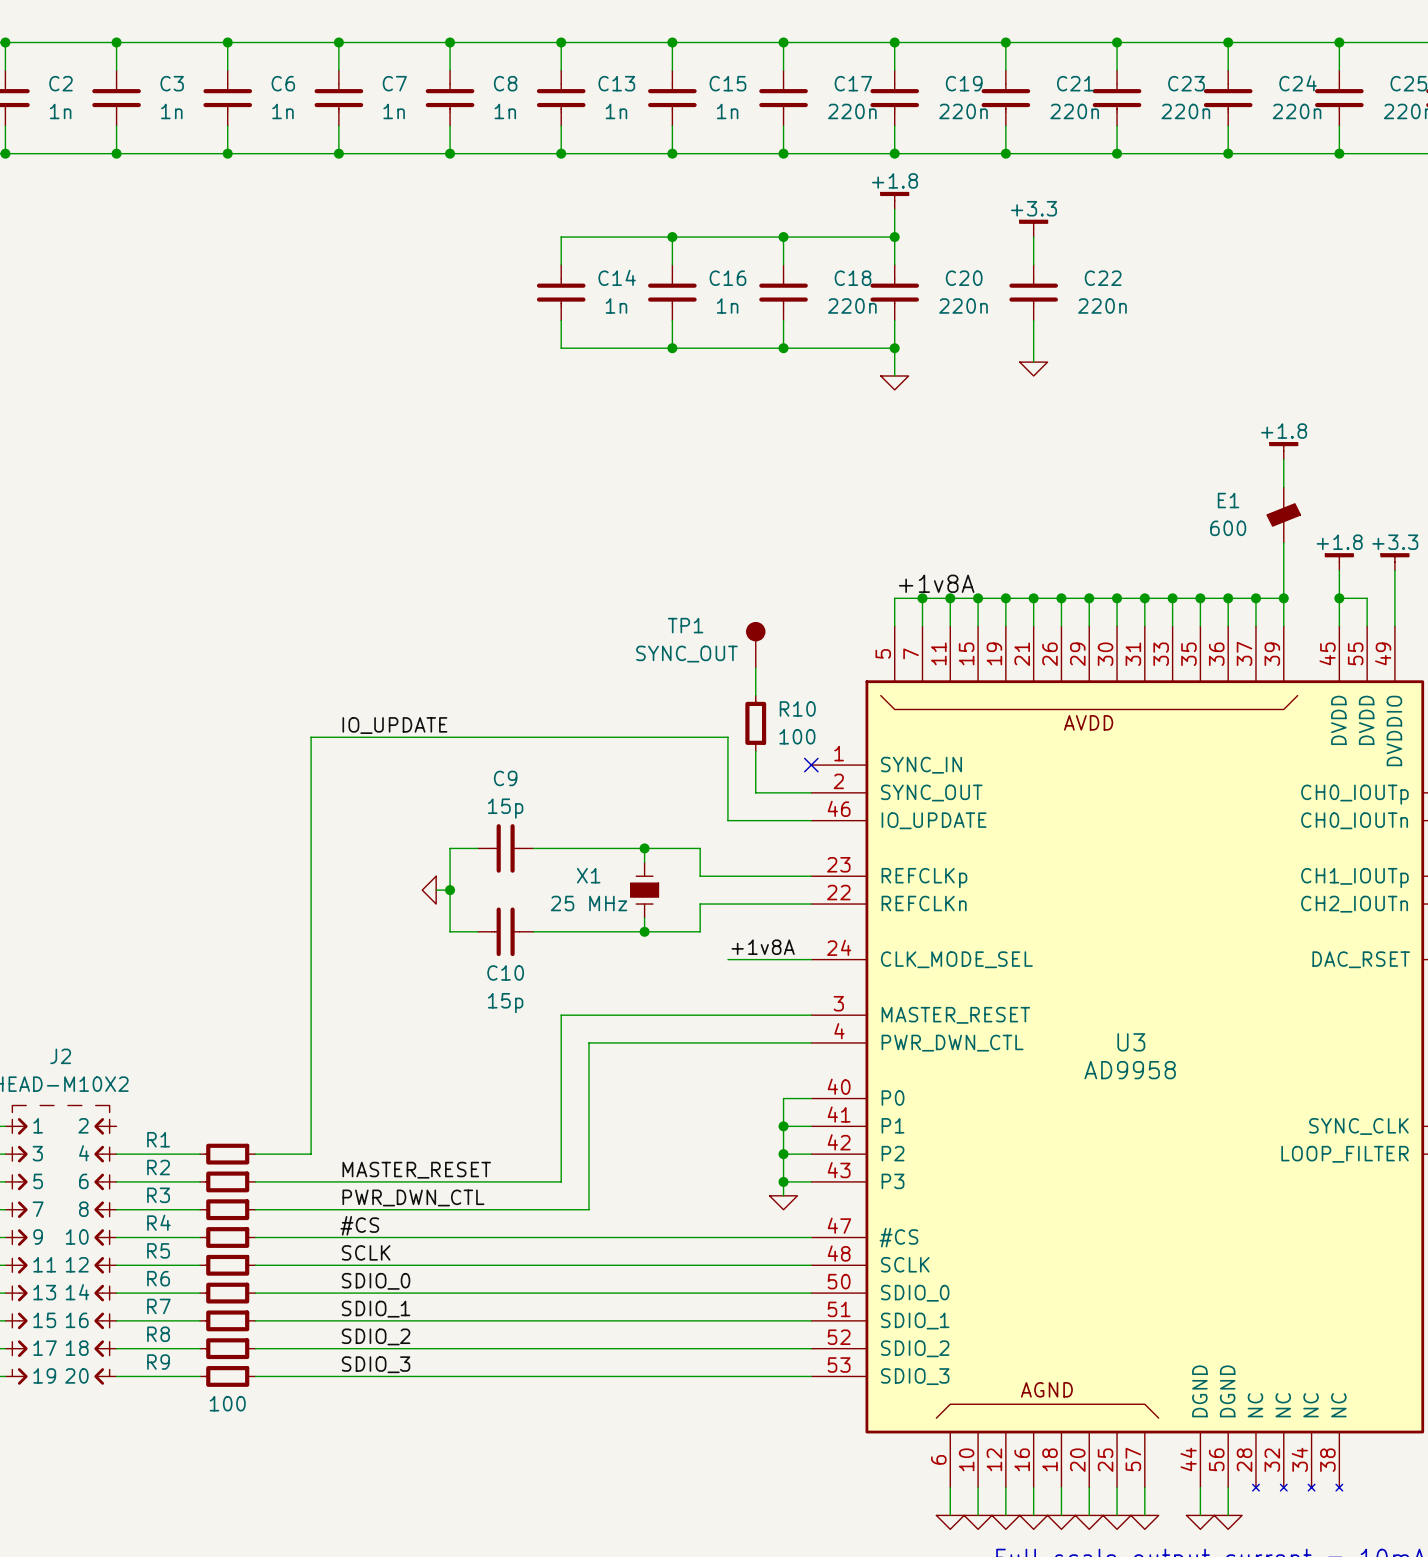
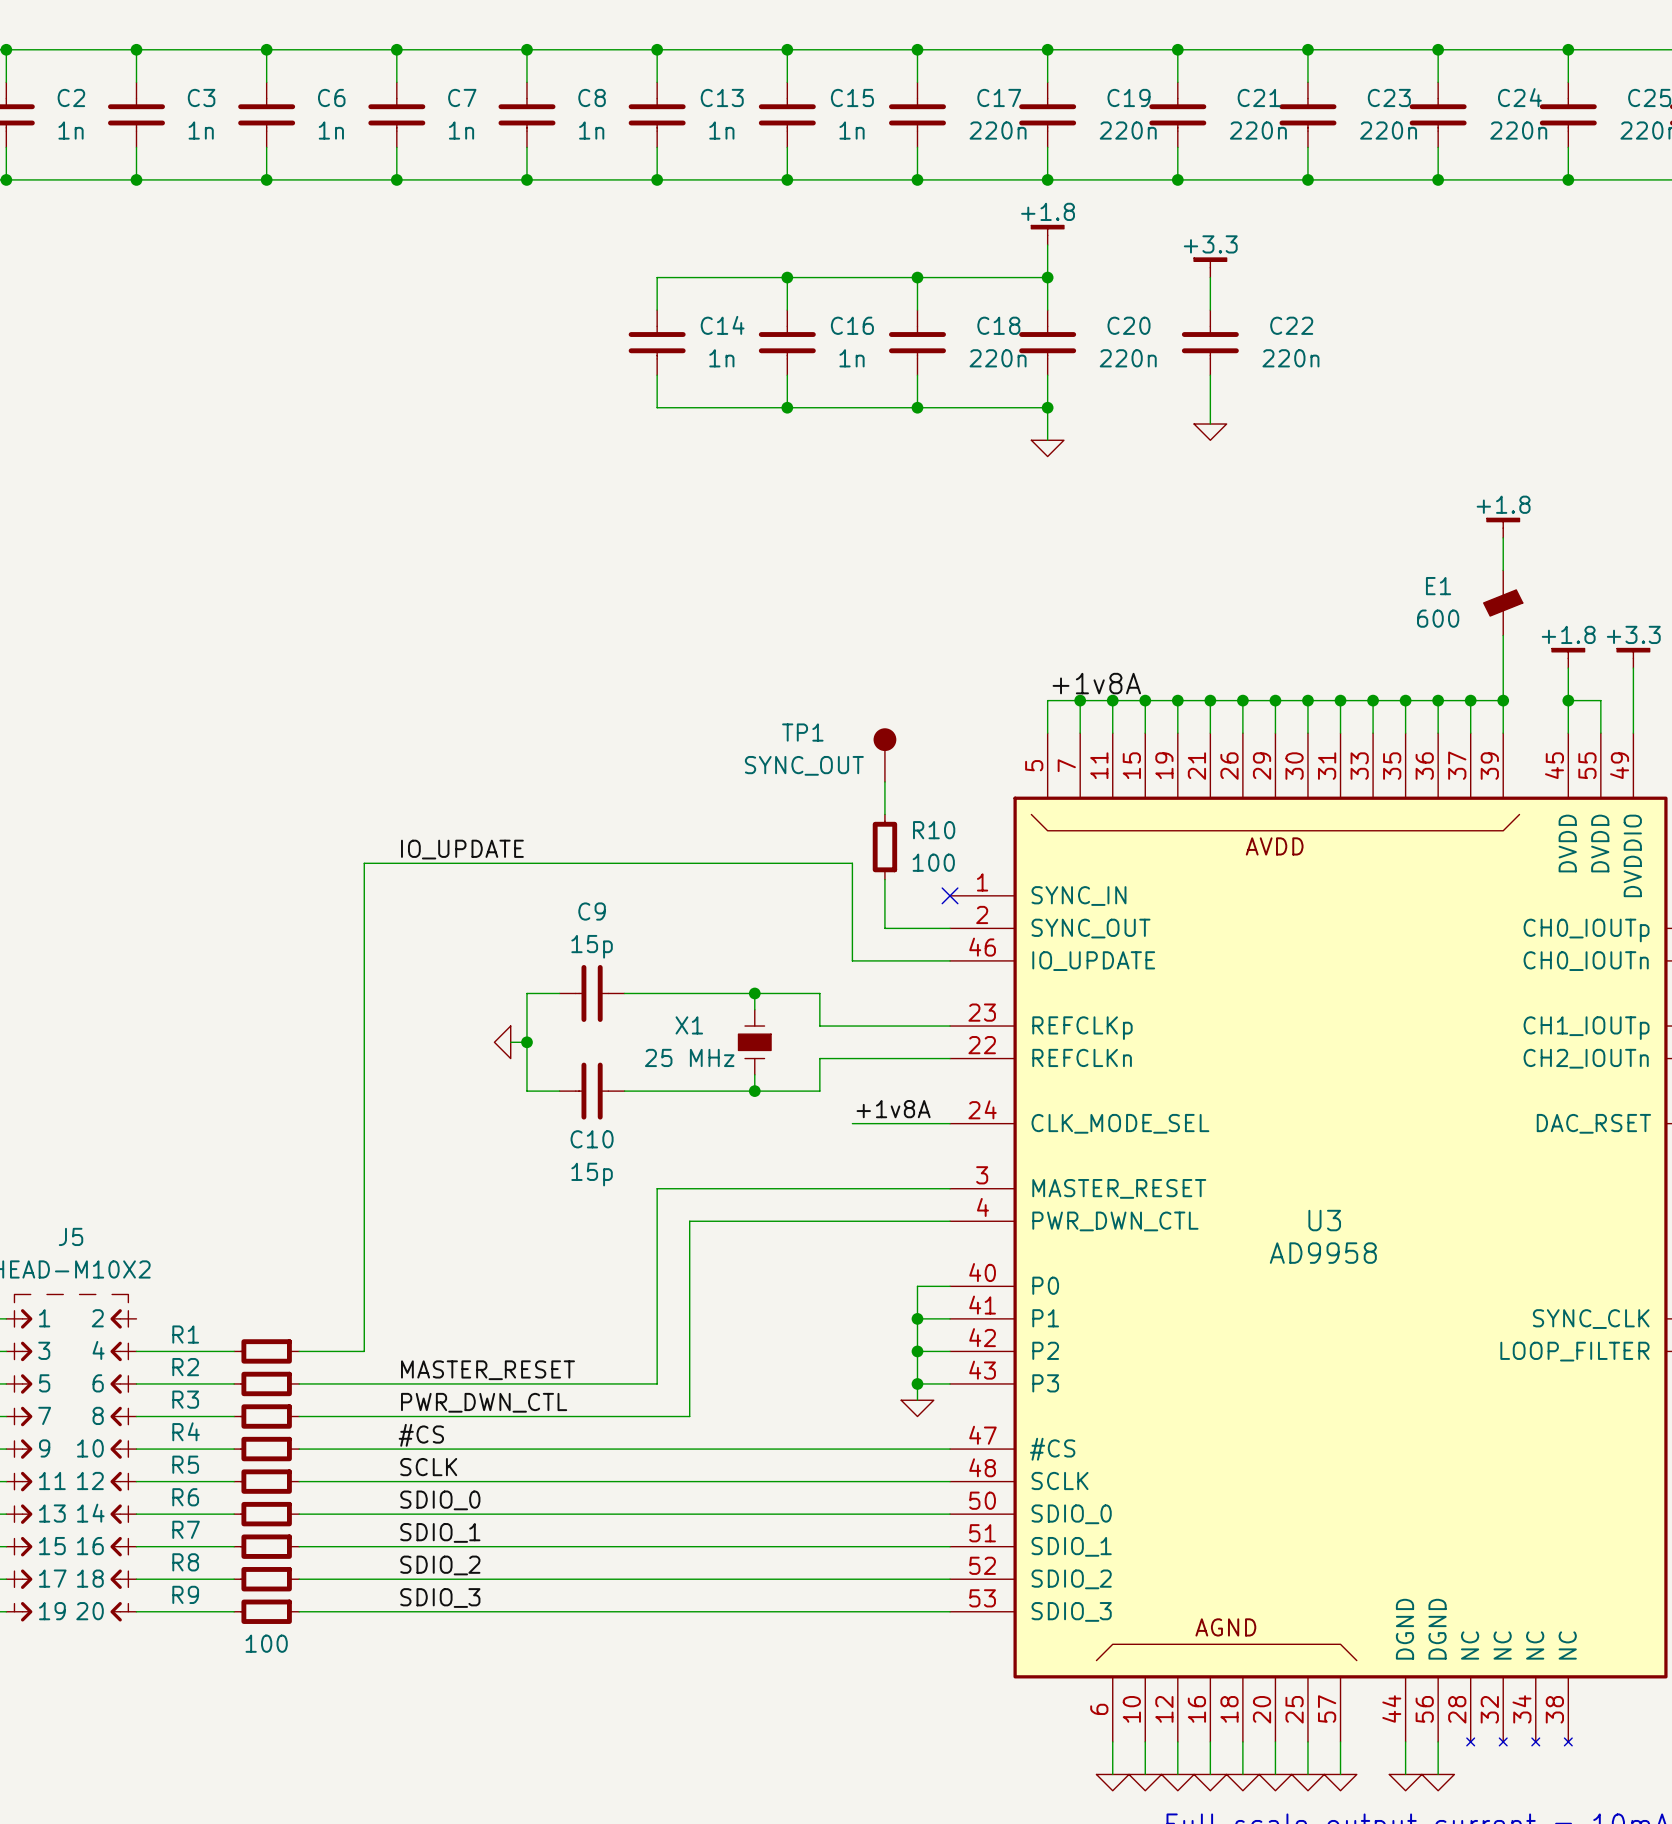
J2 name: J2 (60, 1056) -> J5 (71, 1236)

